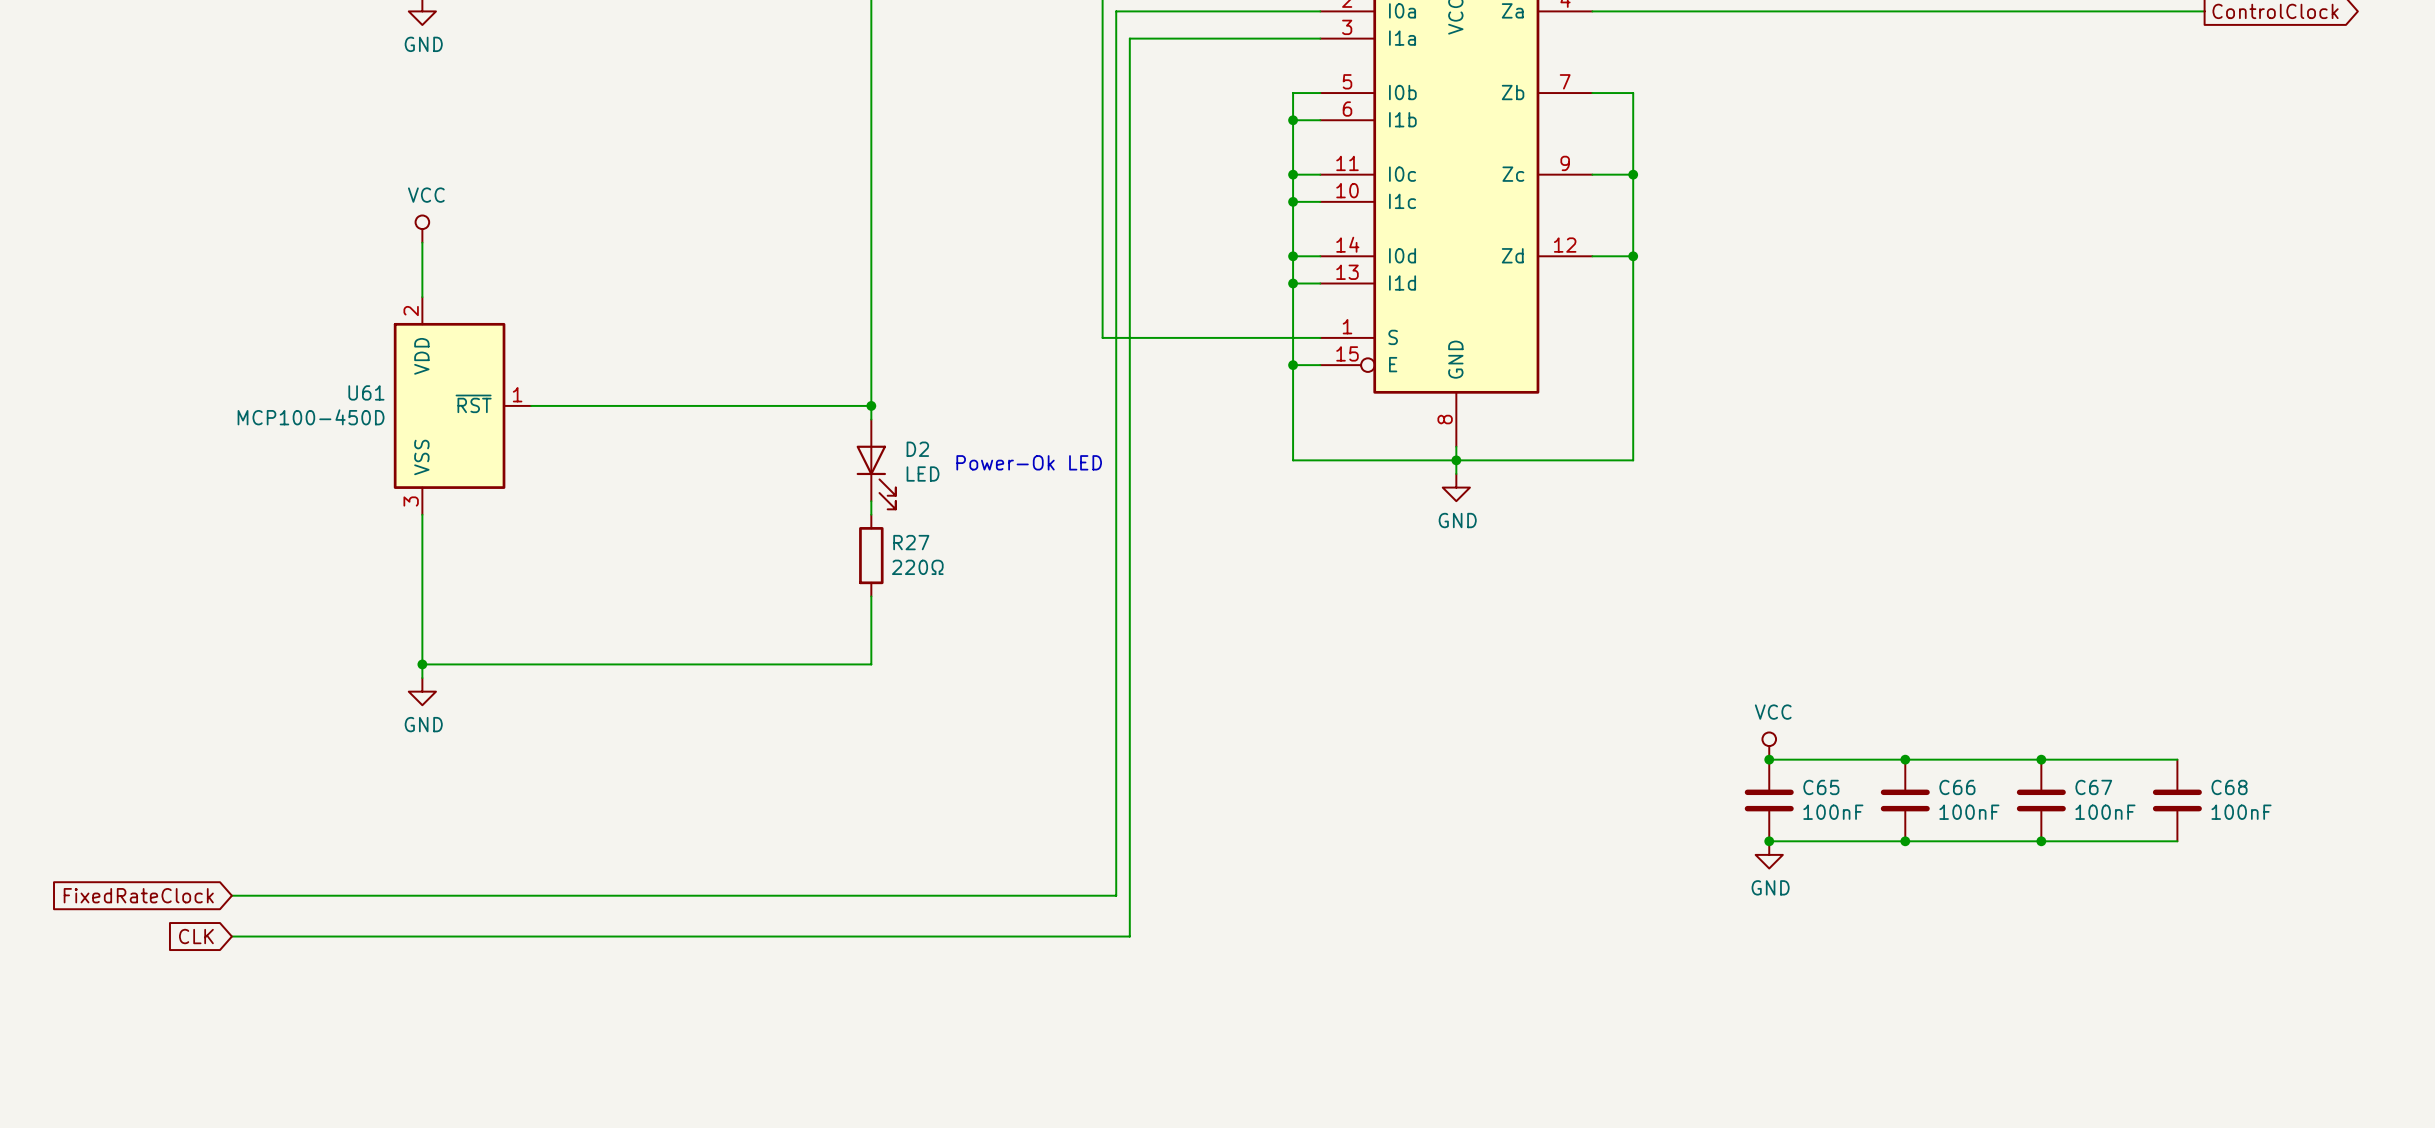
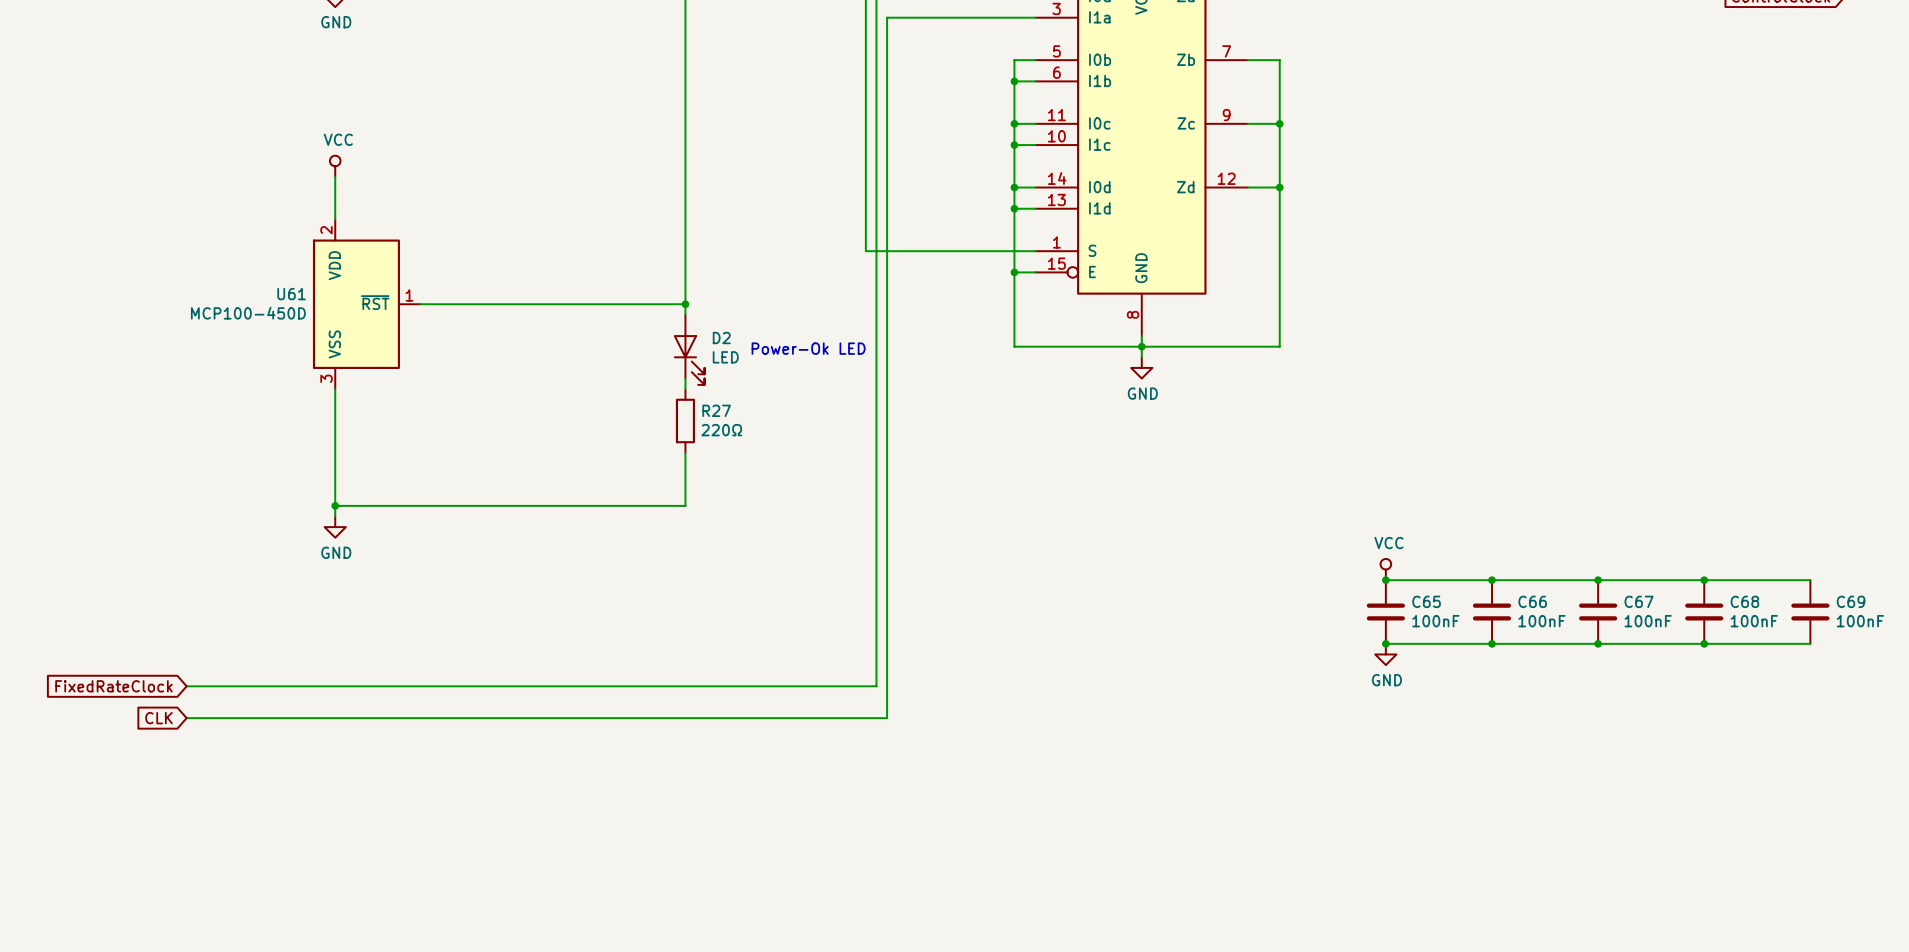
wire: none -> (1704, 580) (1810, 580)
junction: none -> (1704, 580)
C69: none -> 100nF (1810, 612)
wire: none -> (1704, 643) (1810, 643)
junction: none -> (1704, 643)

